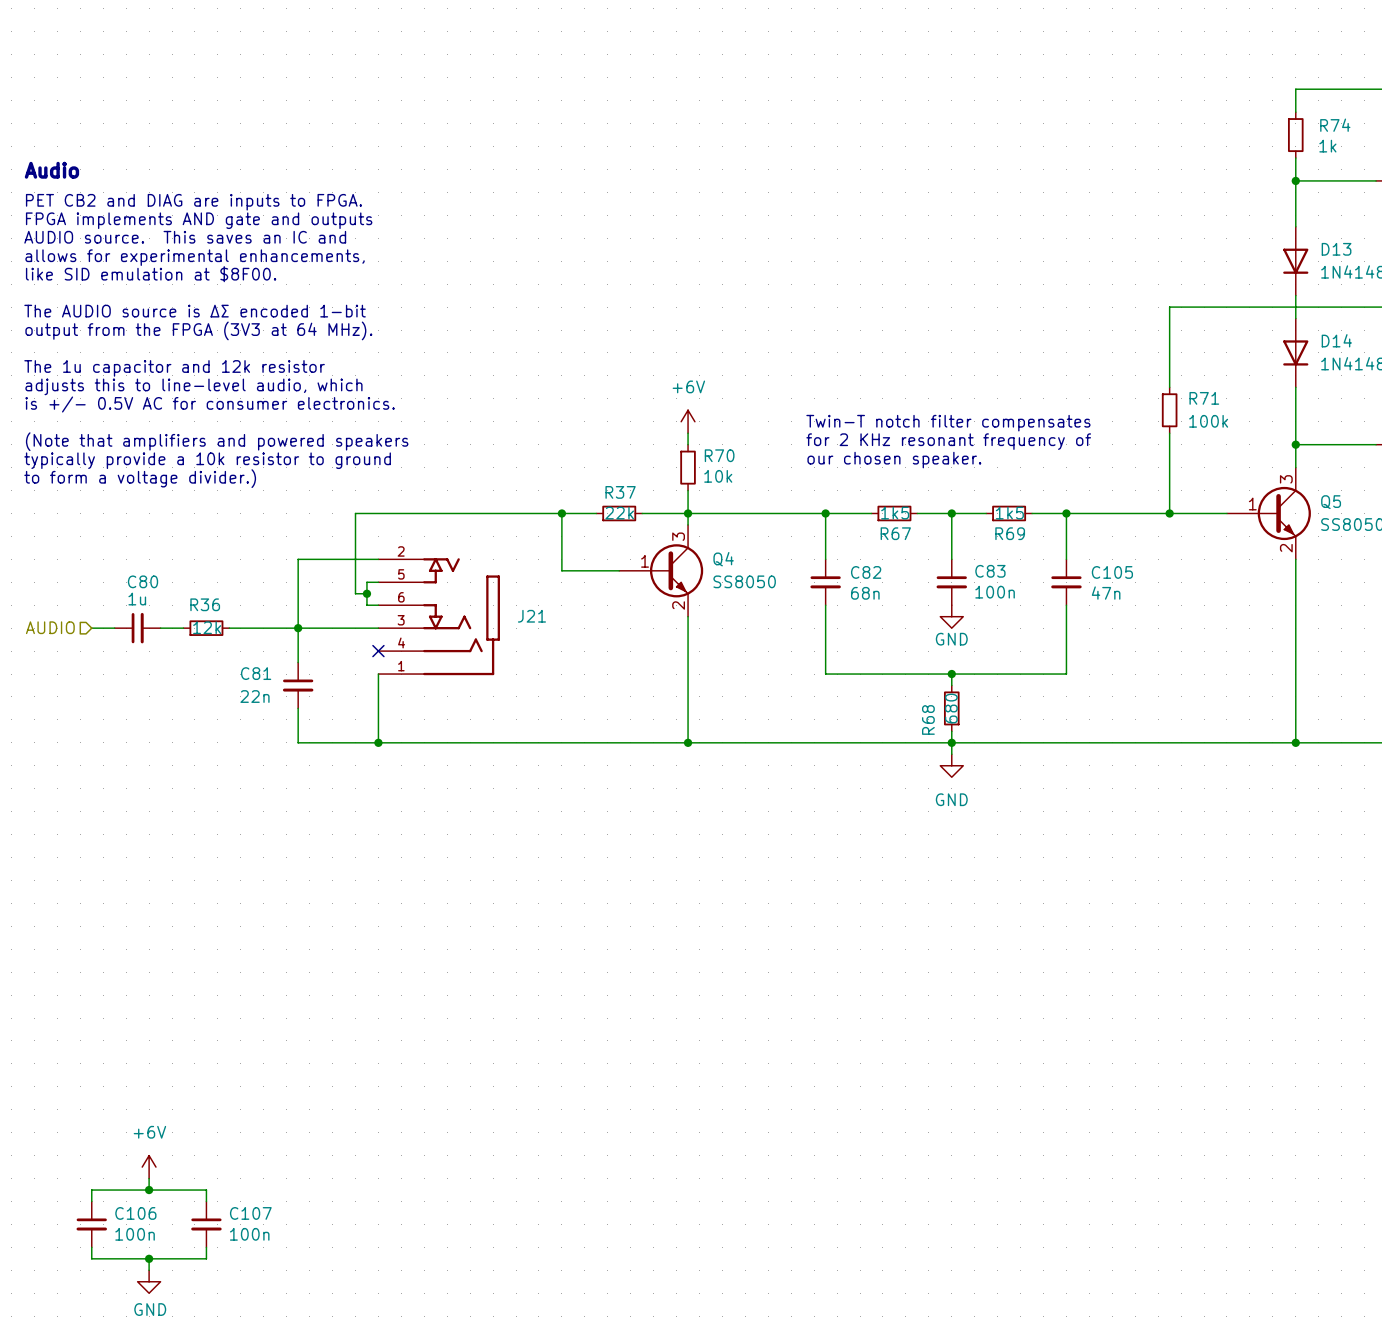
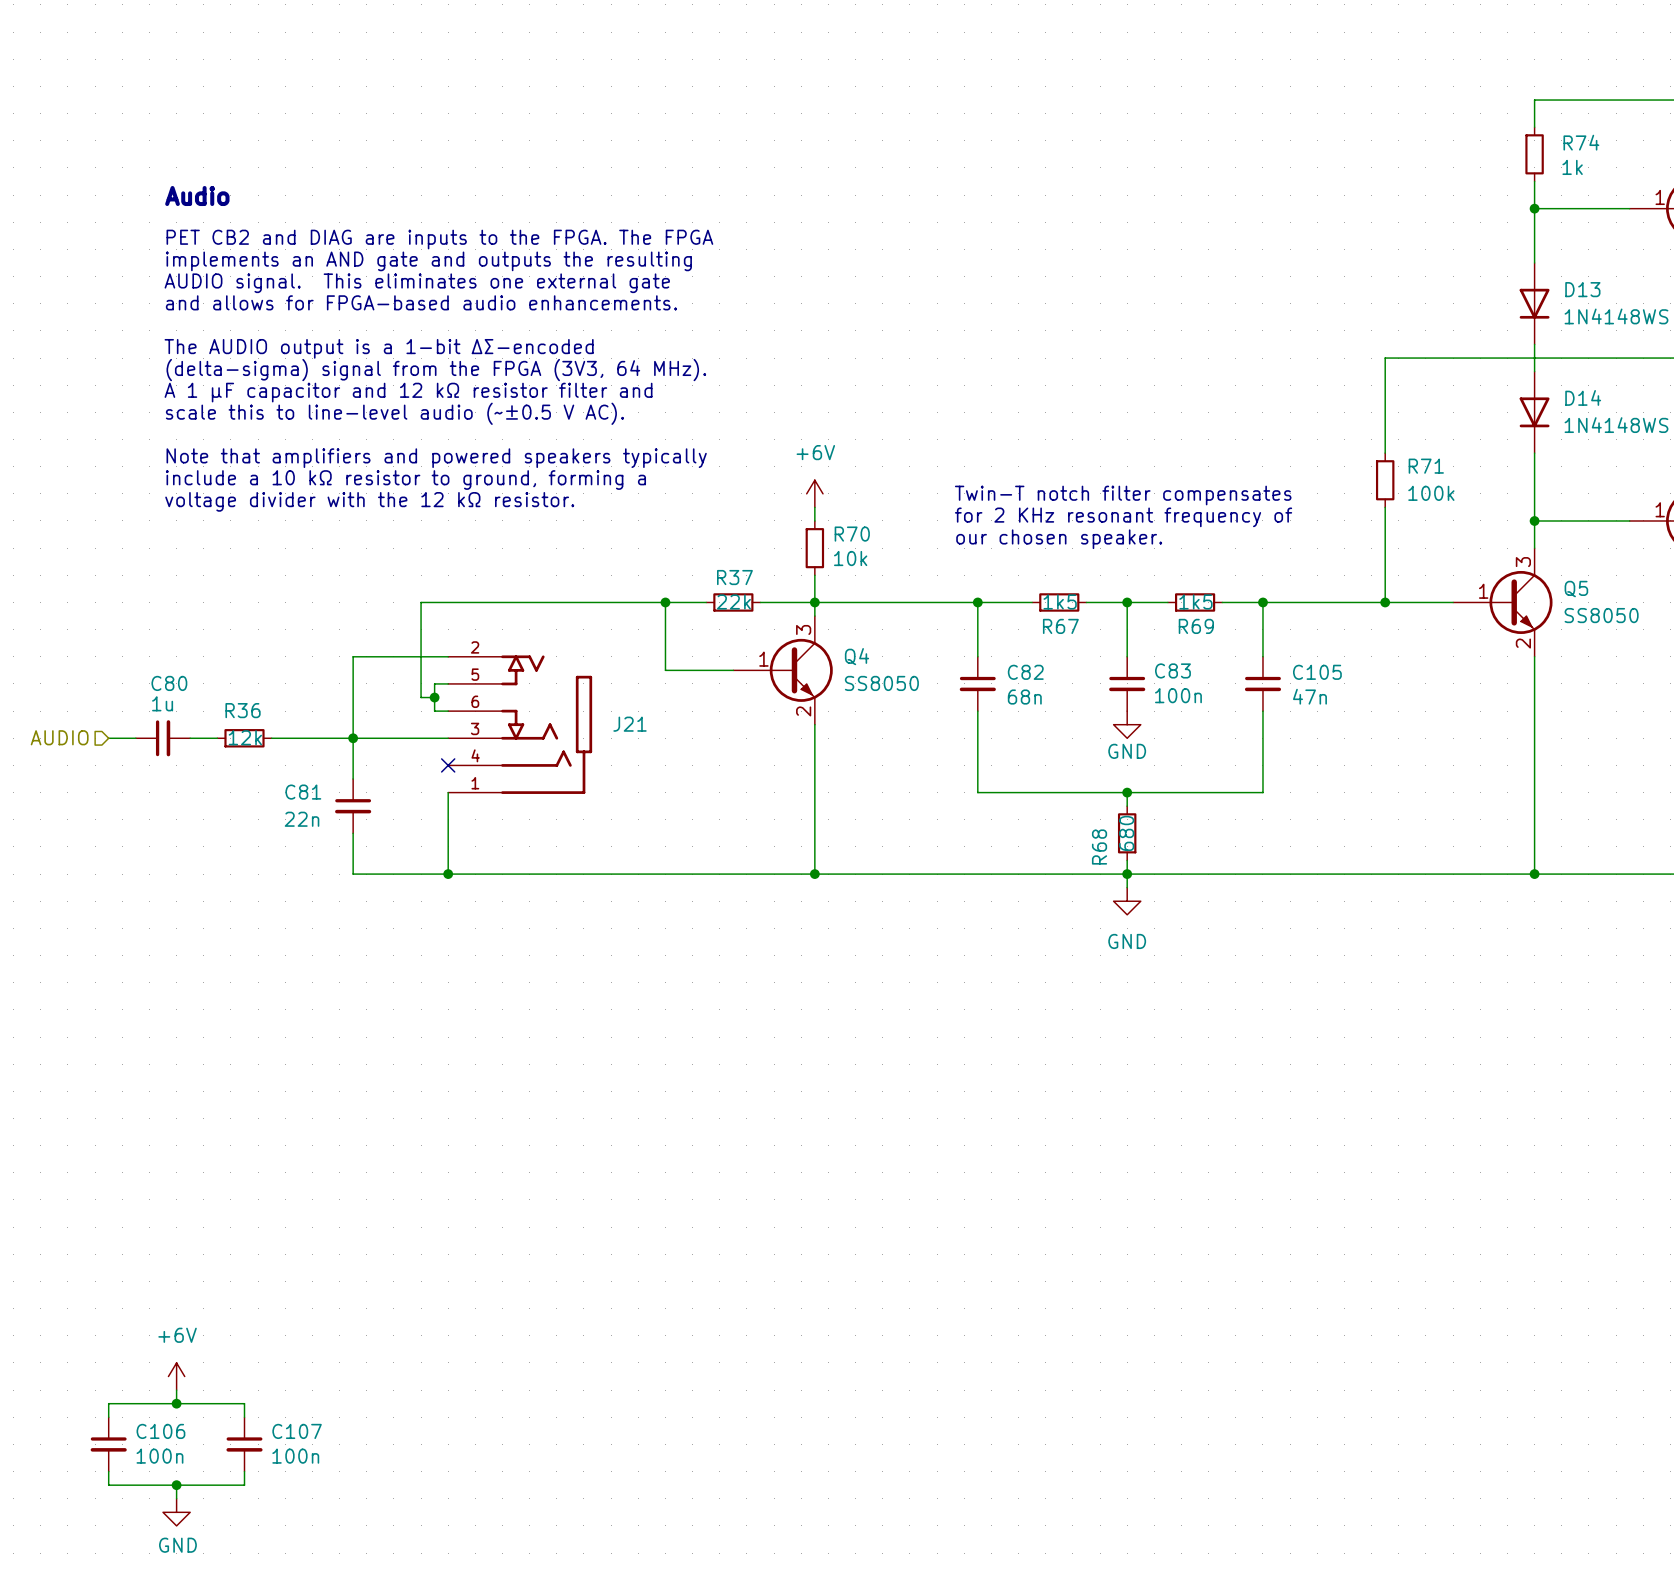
text position: Audio (51, 170) -> Audio (197, 196)
text: PET CB2 and DIAG are inputs to FPGA. (193, 202) -> PET CB2 and DIAG are inputs to the FPGA. The FPGA (439, 239)
text: FPGA implements AND gate and outputs (199, 220) -> implements an AND gate and outputs the resulting (428, 261)
text: AUDIO source. This saves an IC and (185, 237) -> none
text: none -> AUDIO signal. This eliminates one external gate (417, 283)
text: allows for experimental enhancements, (195, 257) -> and allows for FPGA-based audio enhancements. (421, 302)
text: like SID emulation at $8F00. (151, 274) -> none
text: The AUDIO source is ΔΣ encoded 1-bit (195, 311) -> The AUDIO output is a 1-bit ΔΣ-encoded (379, 348)
text: output from the FPGA (3V3 at 64 MHz). (198, 330) -> (delta-sigma) signal from the FPGA (3V3, 64 MHz). (436, 370)
text: none -> A 1 µF capacitor and 12 kΩ resistor filter and (408, 392)
text: none -> scale this to line-level audio (~±0.5 V AC). (394, 413)
text: The 1u capacitor and 12k resistor (174, 368) -> none
text: adjusts this to line-level audio, which (193, 386) -> none
text: none -> Note that amplifiers and powered speakers typically (436, 458)
text: is +/- 0.5V AC for consumer electronics. (210, 404) -> none
text: none -> include a 10 kΩ resistor to ground, forming a (405, 480)
text: none -> voltage divider with the 12 kΩ resistor. (369, 501)
text: (Note that amplifiers and powered speakers (217, 441) -> none
text: typically provide a 10k resistor to ground (207, 460) -> none
text: to form a voltage divider.) (140, 478) -> none

